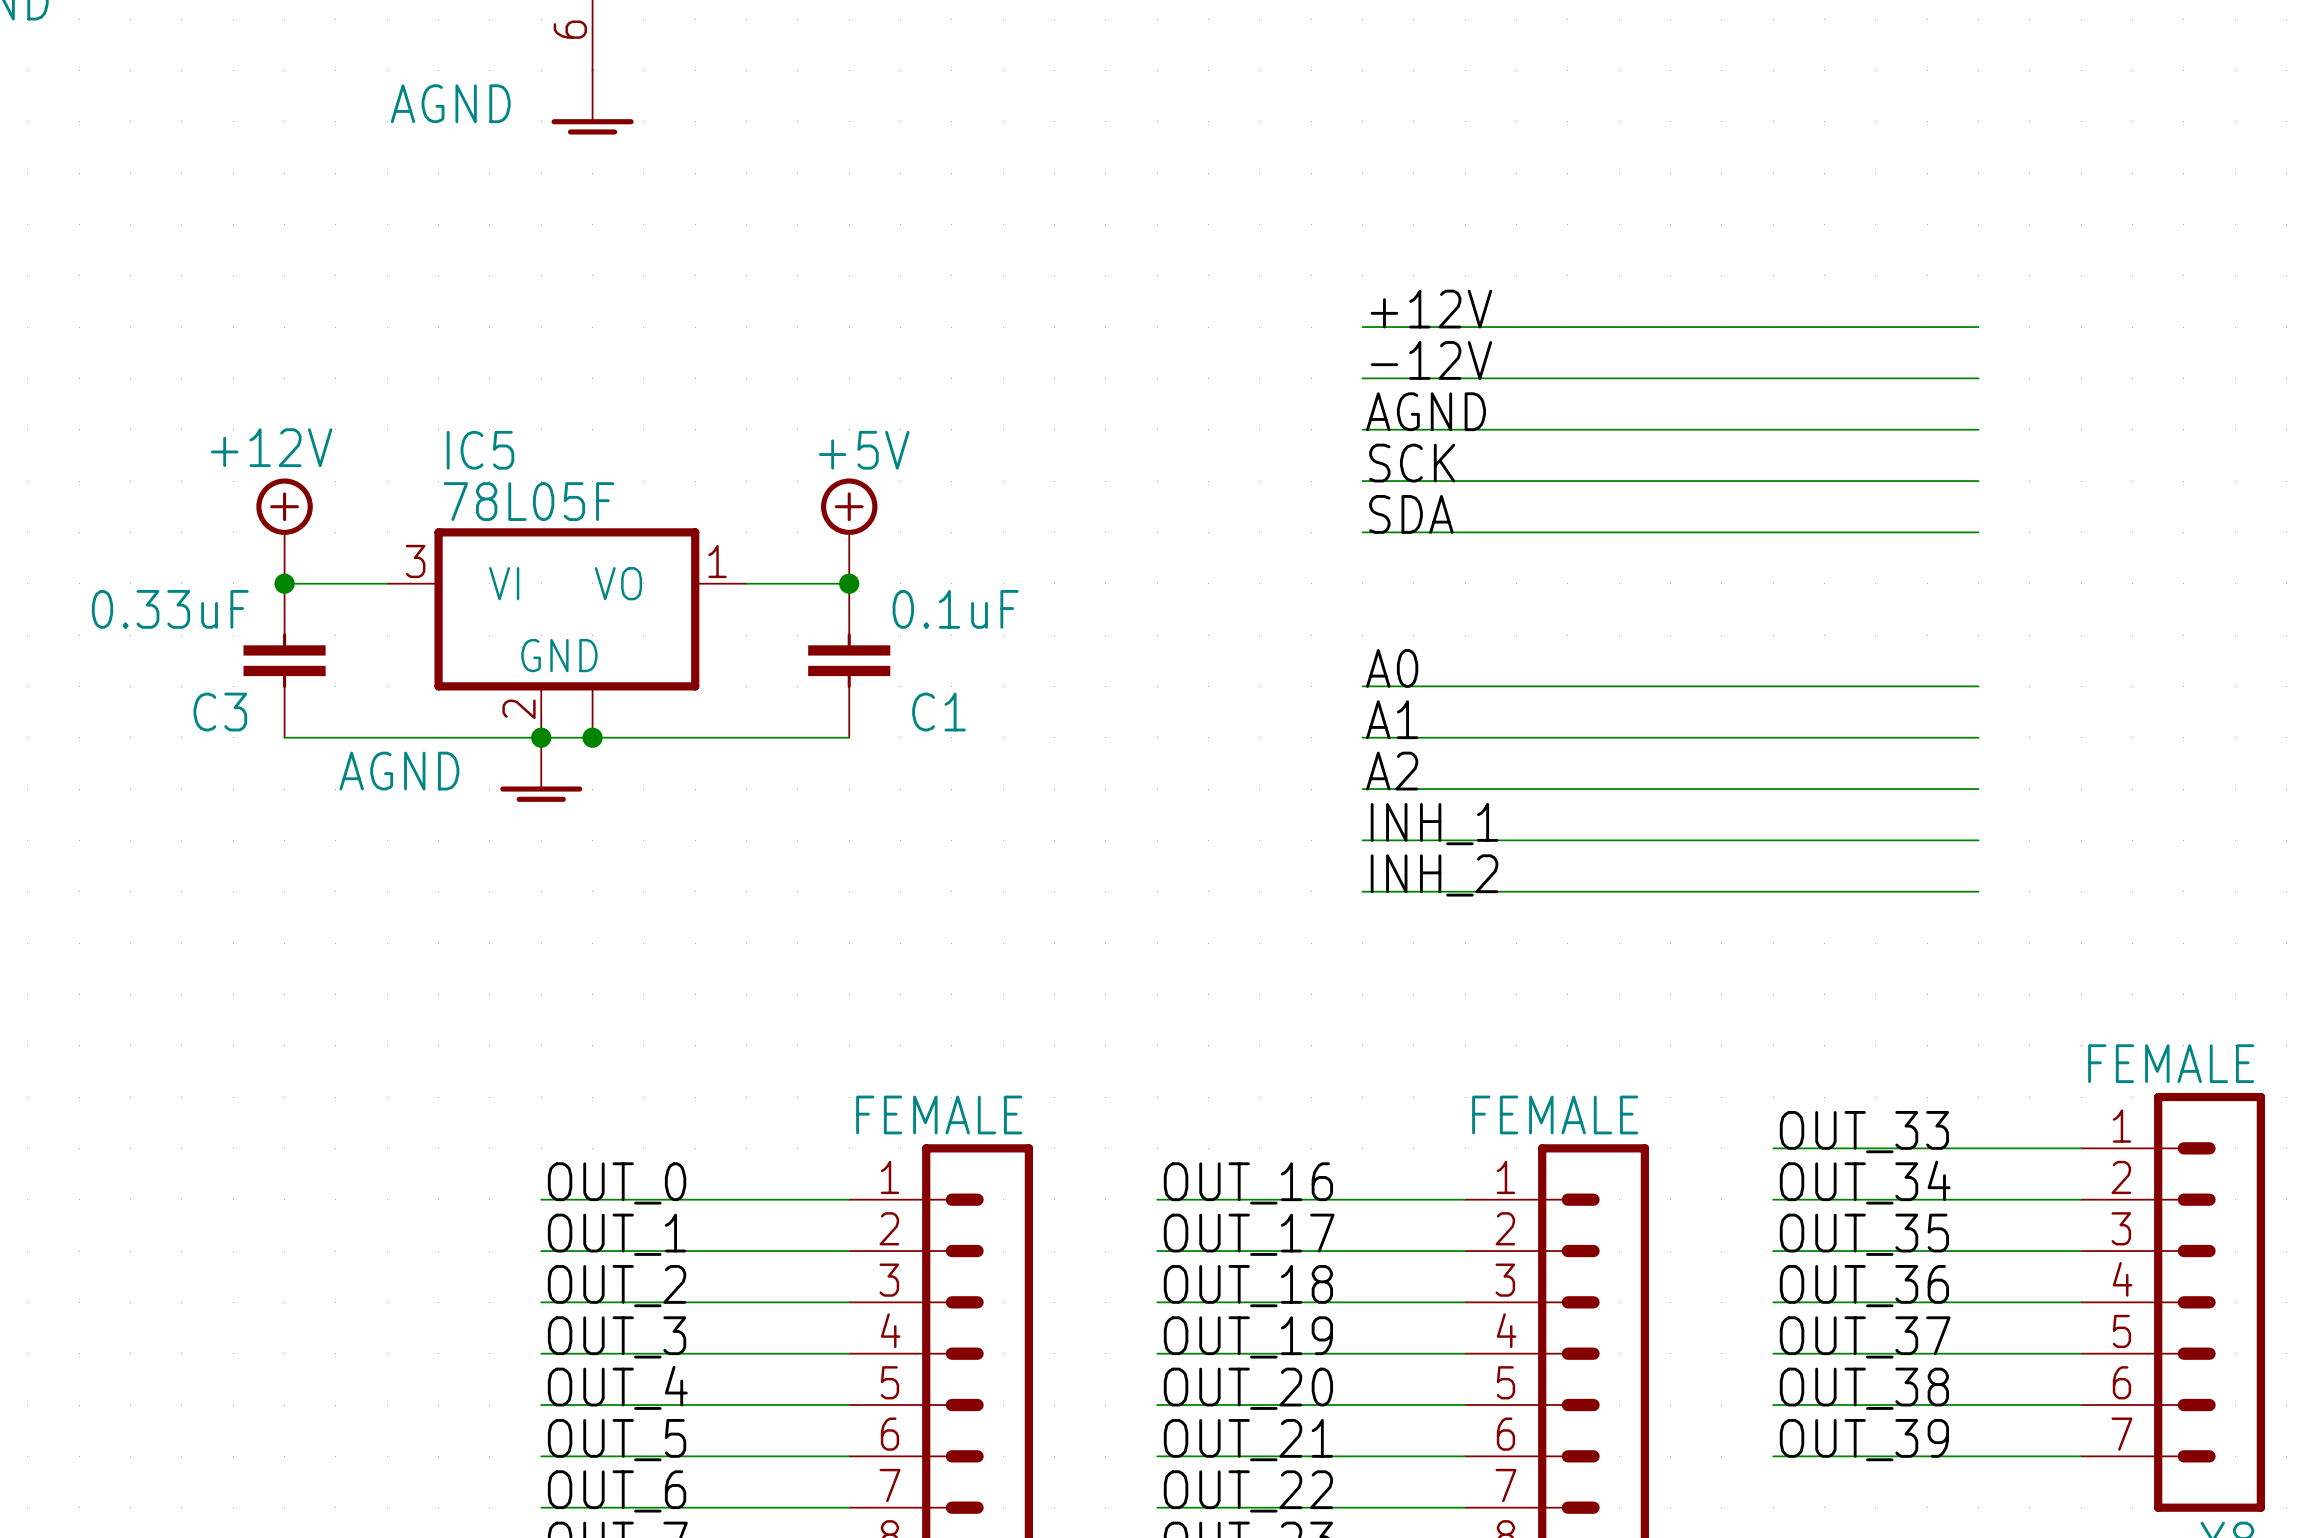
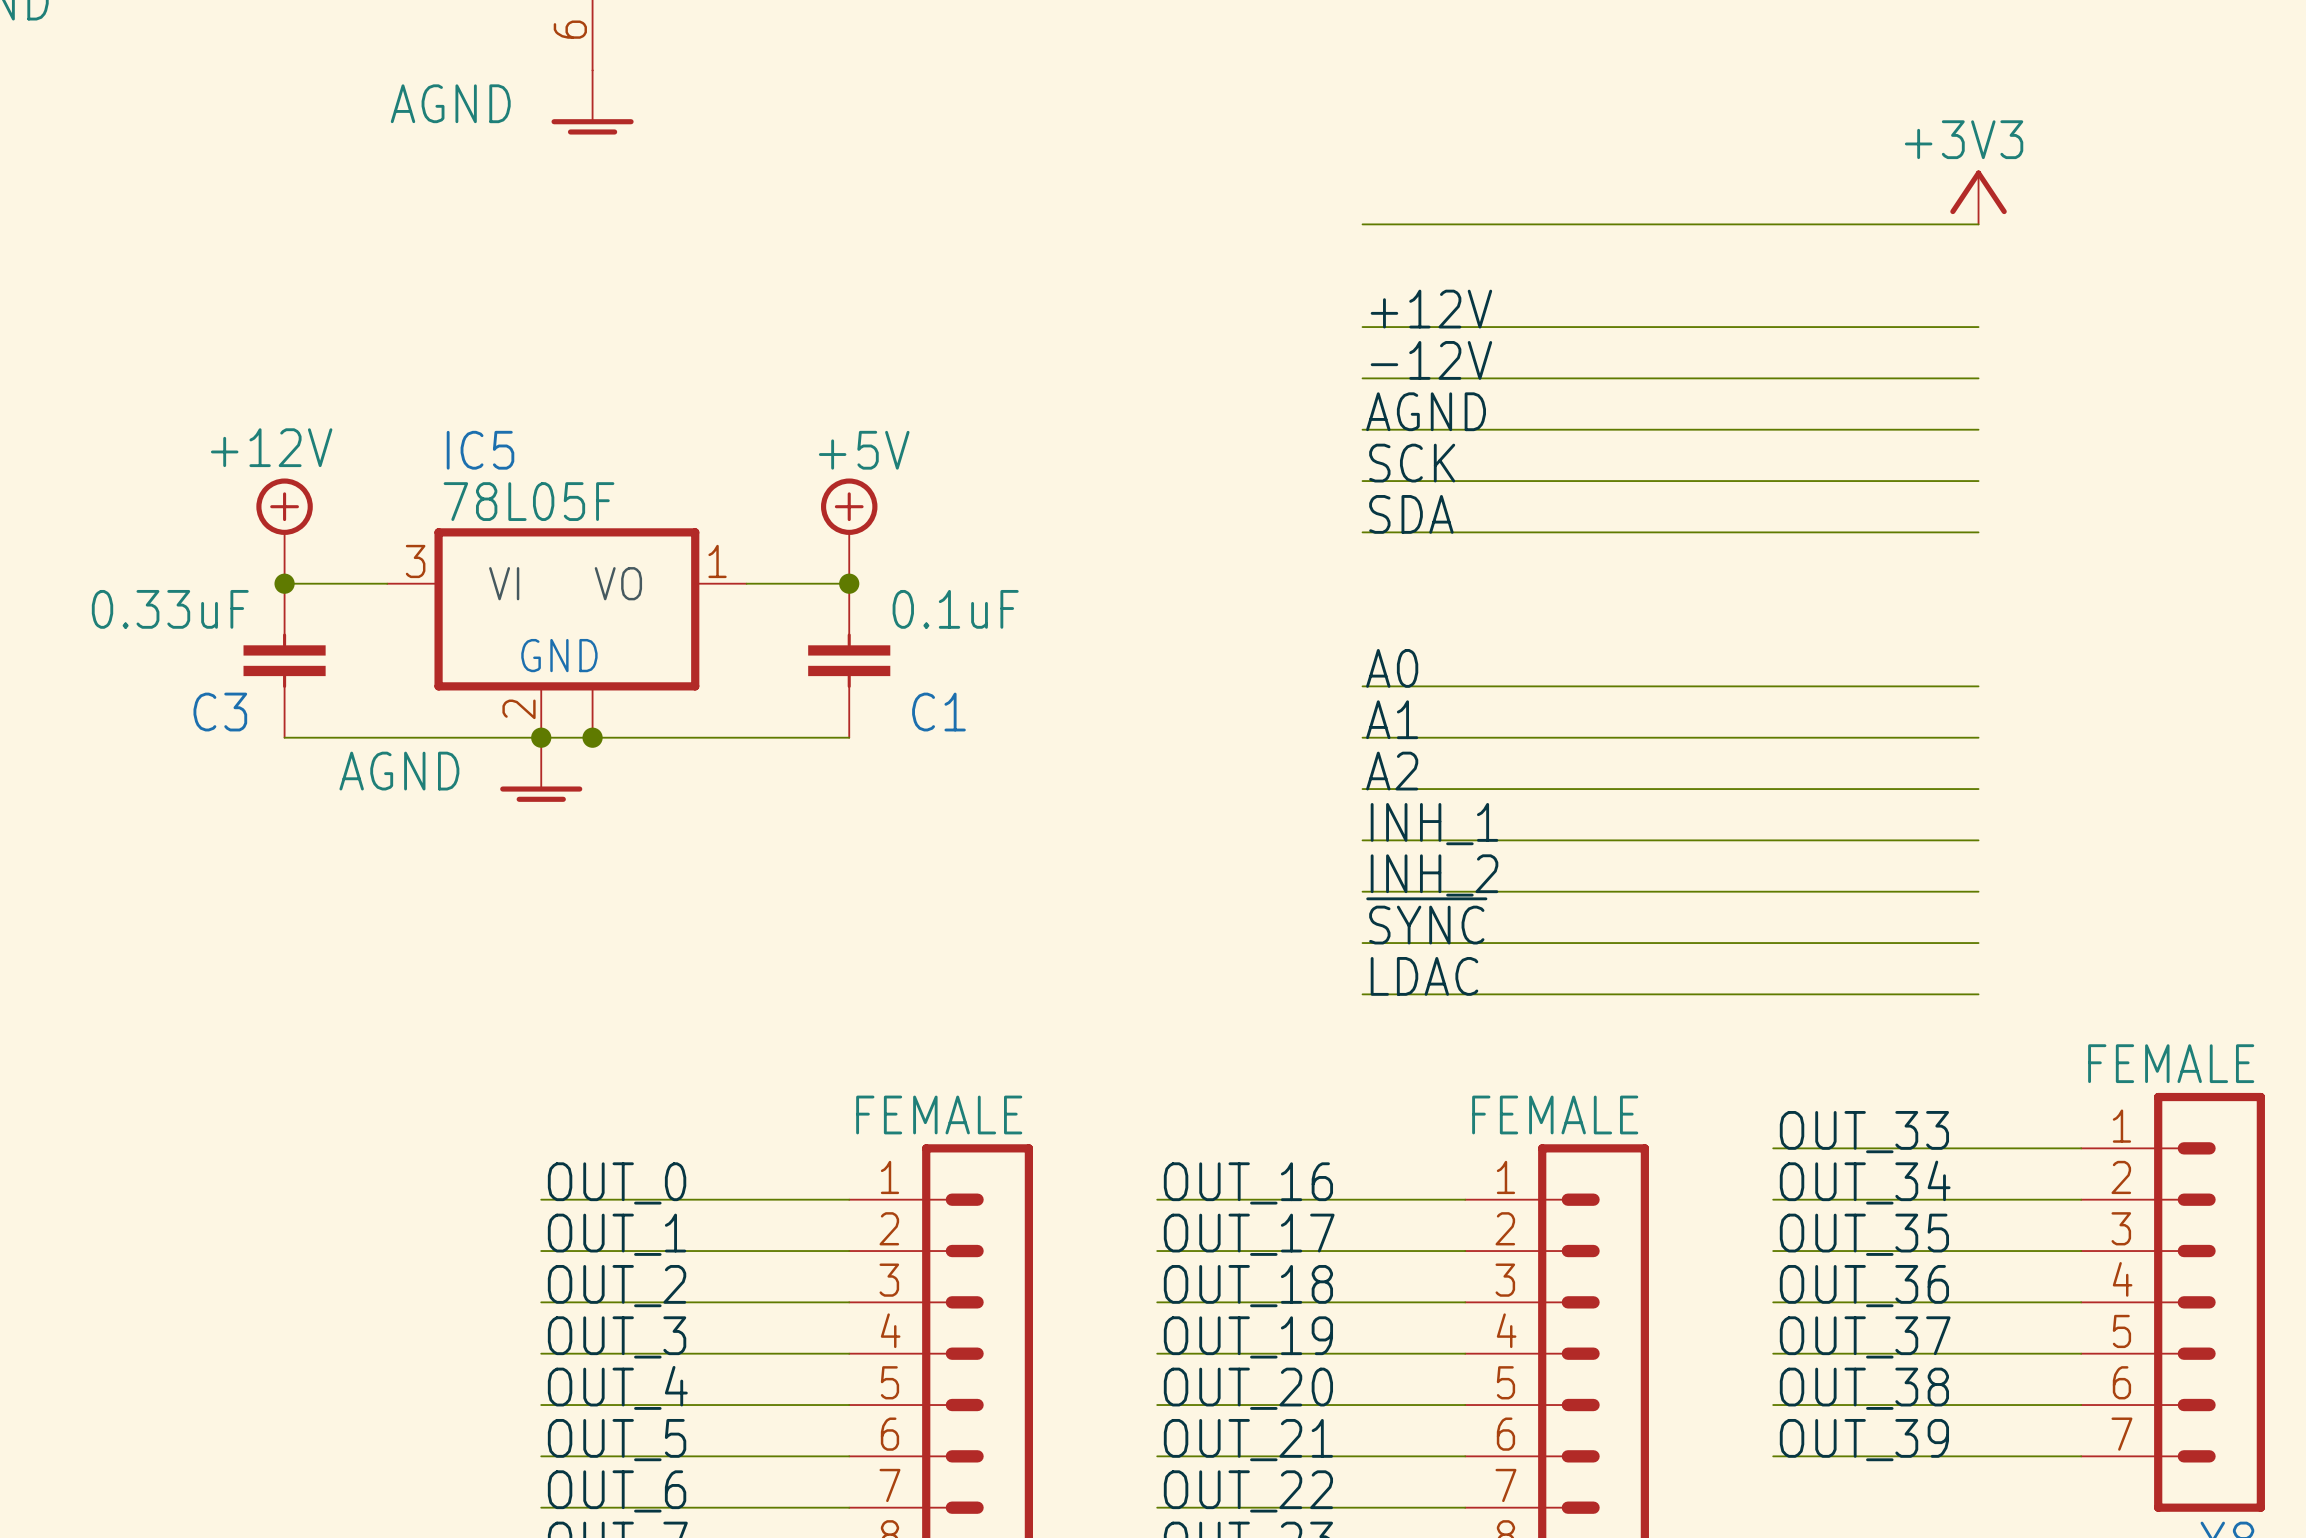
power symbol: none -> +3V3 (1978, 197)
wire: none -> (1362, 224) (1978, 224)
label: none -> ~{SYNC} (1426, 920)
wire: none -> (1362, 943) (1978, 943)
label: none -> LDAC (1424, 976)
wire: none -> (1362, 994) (1978, 994)

